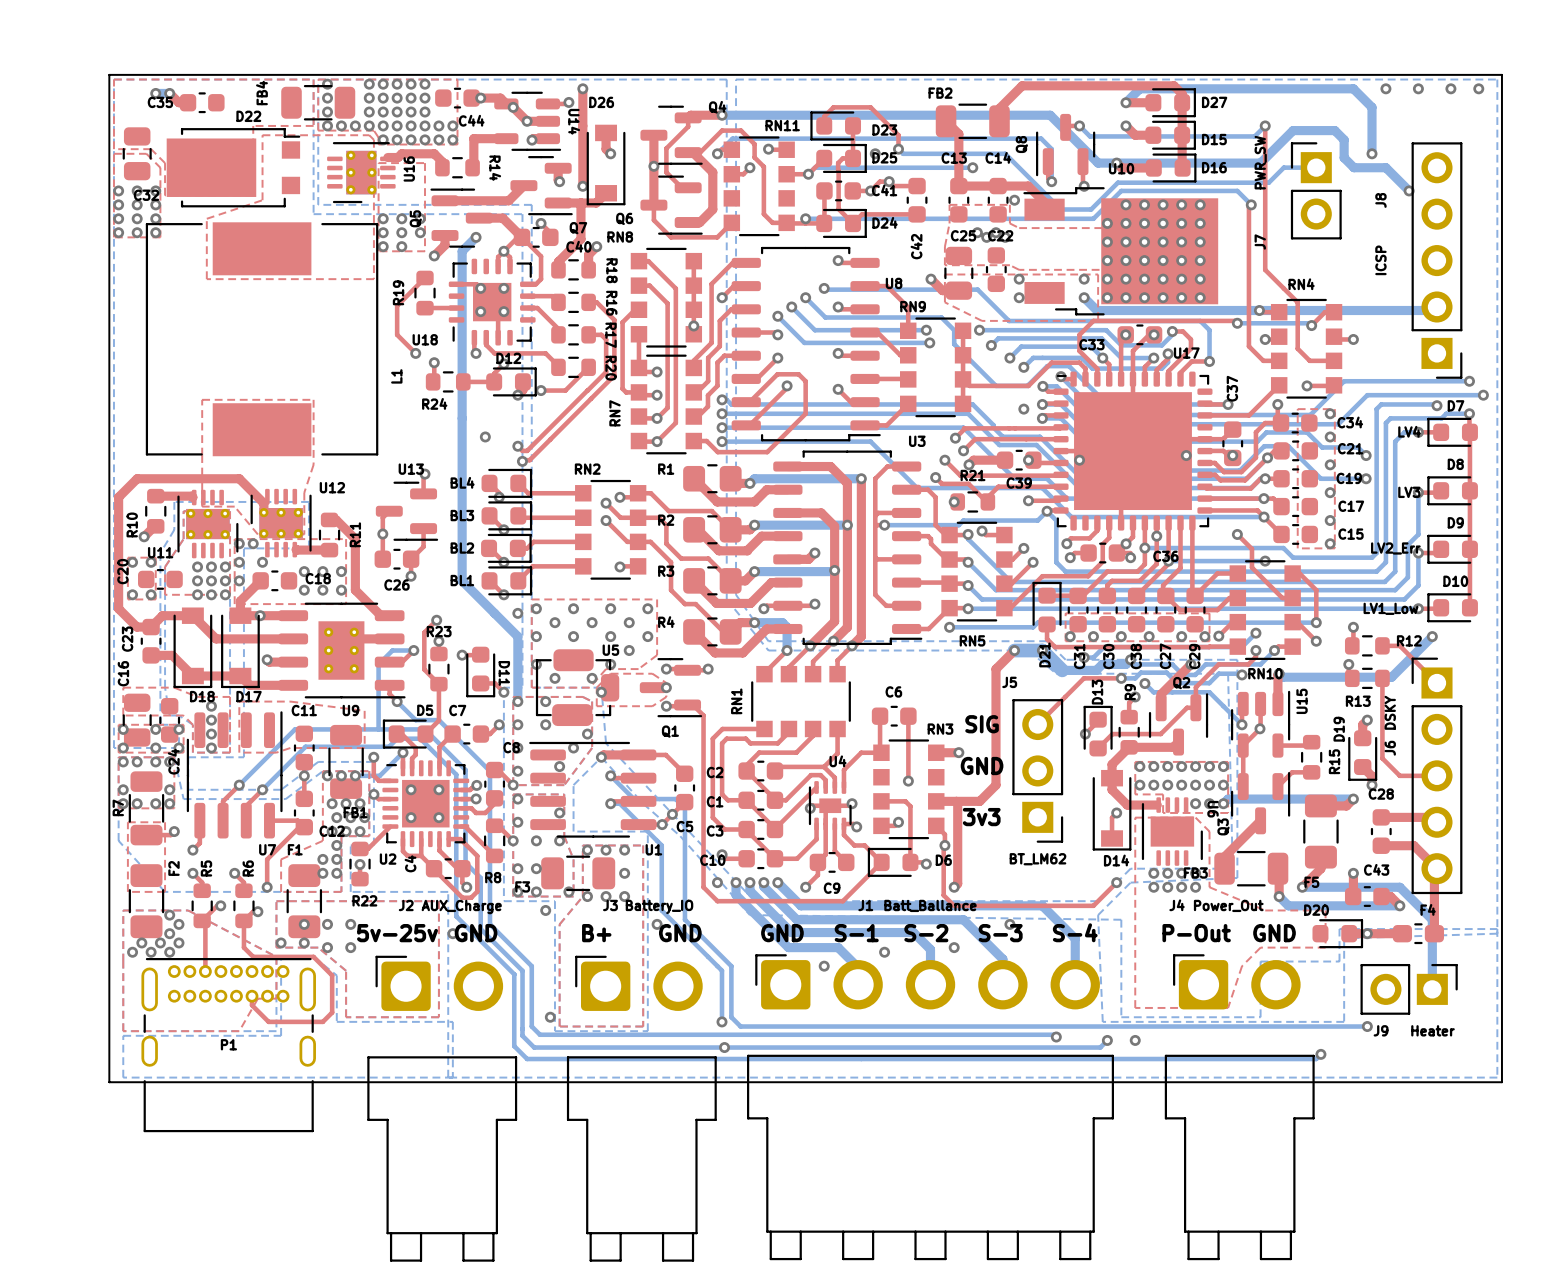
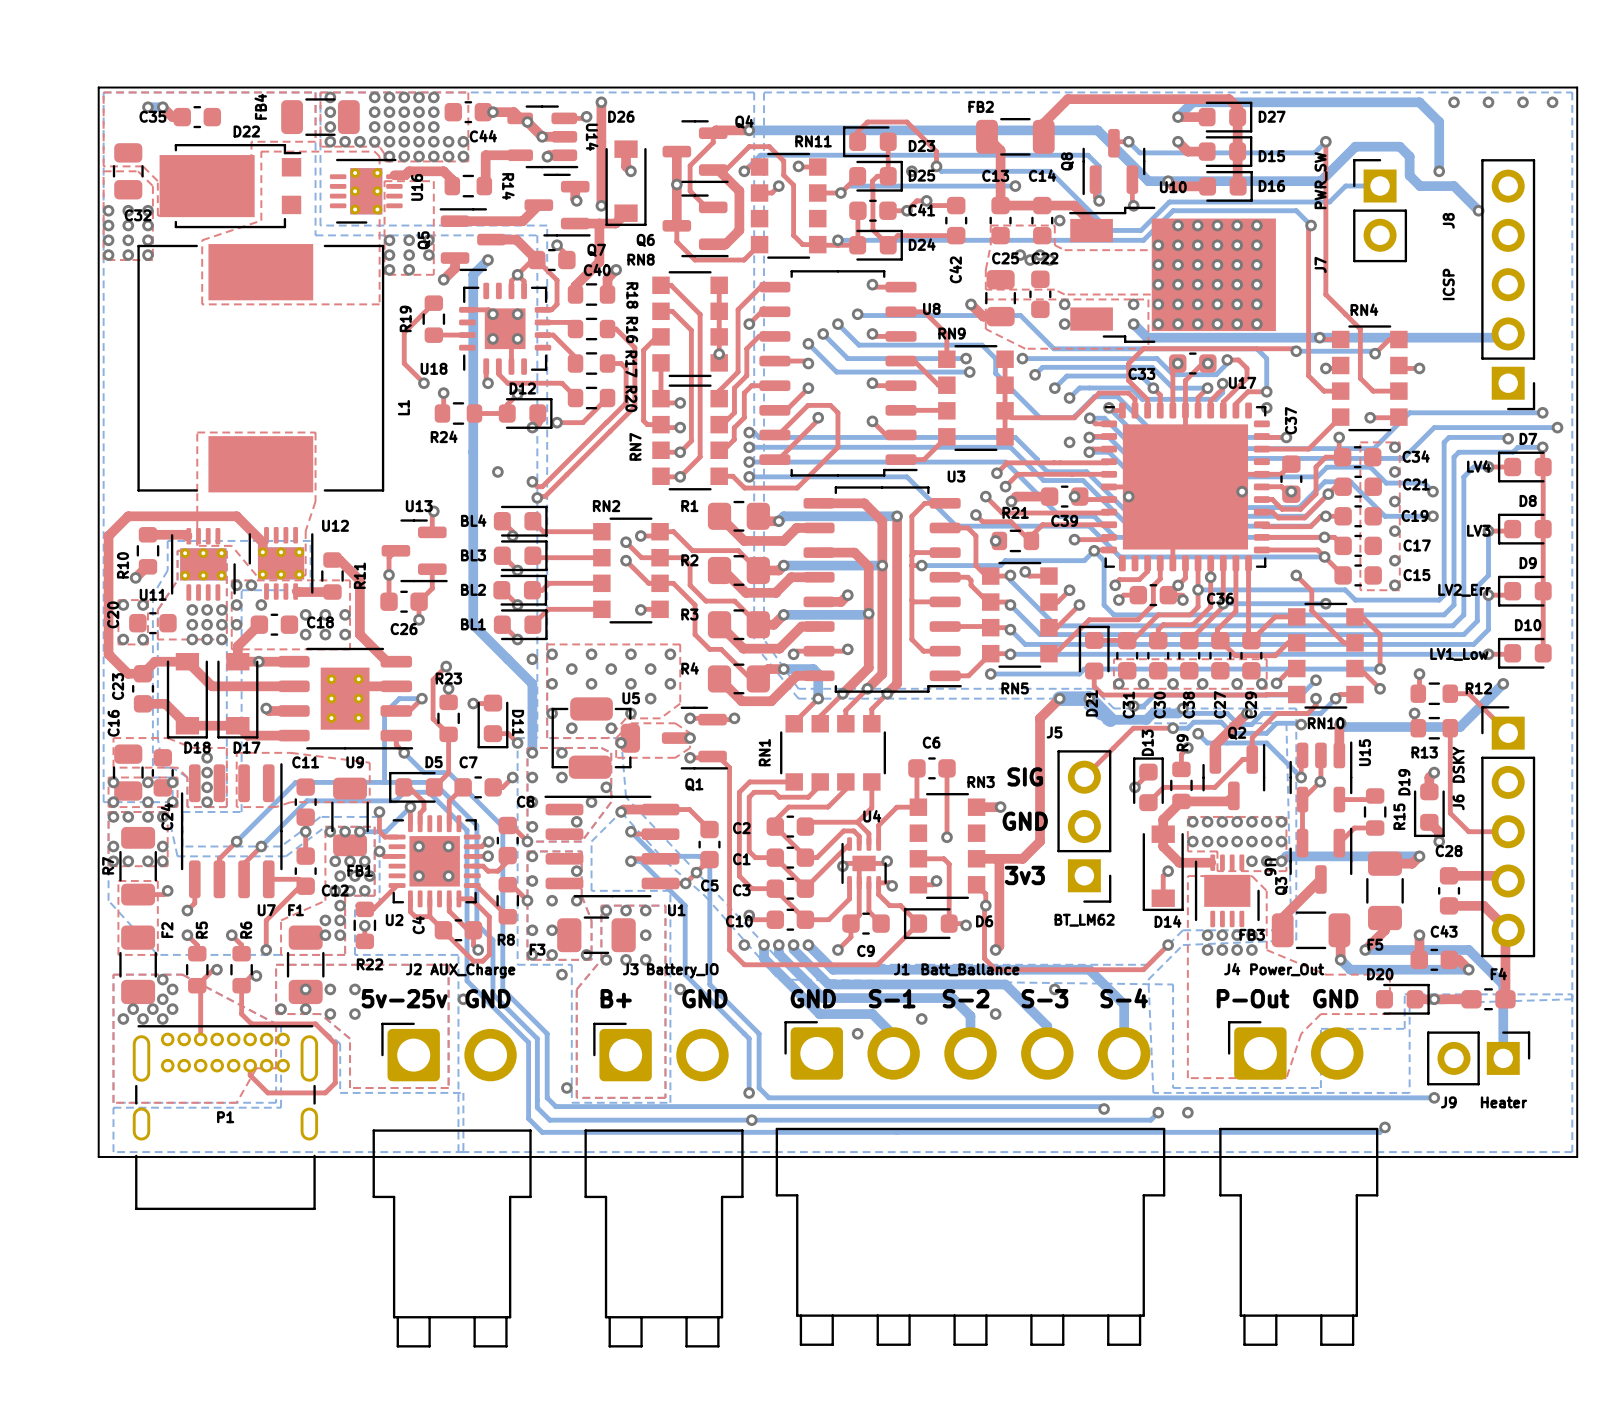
via: none -> (1266, 407)

